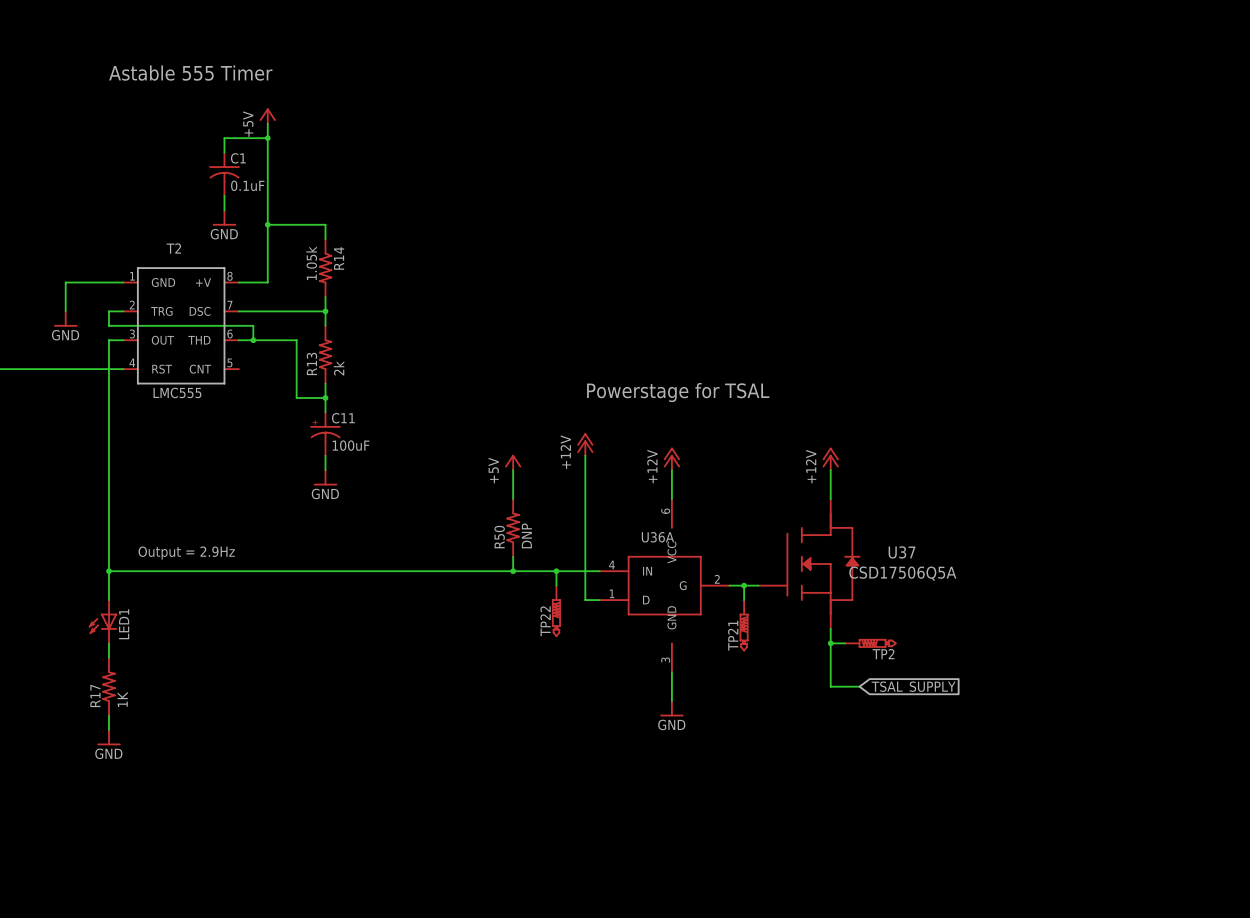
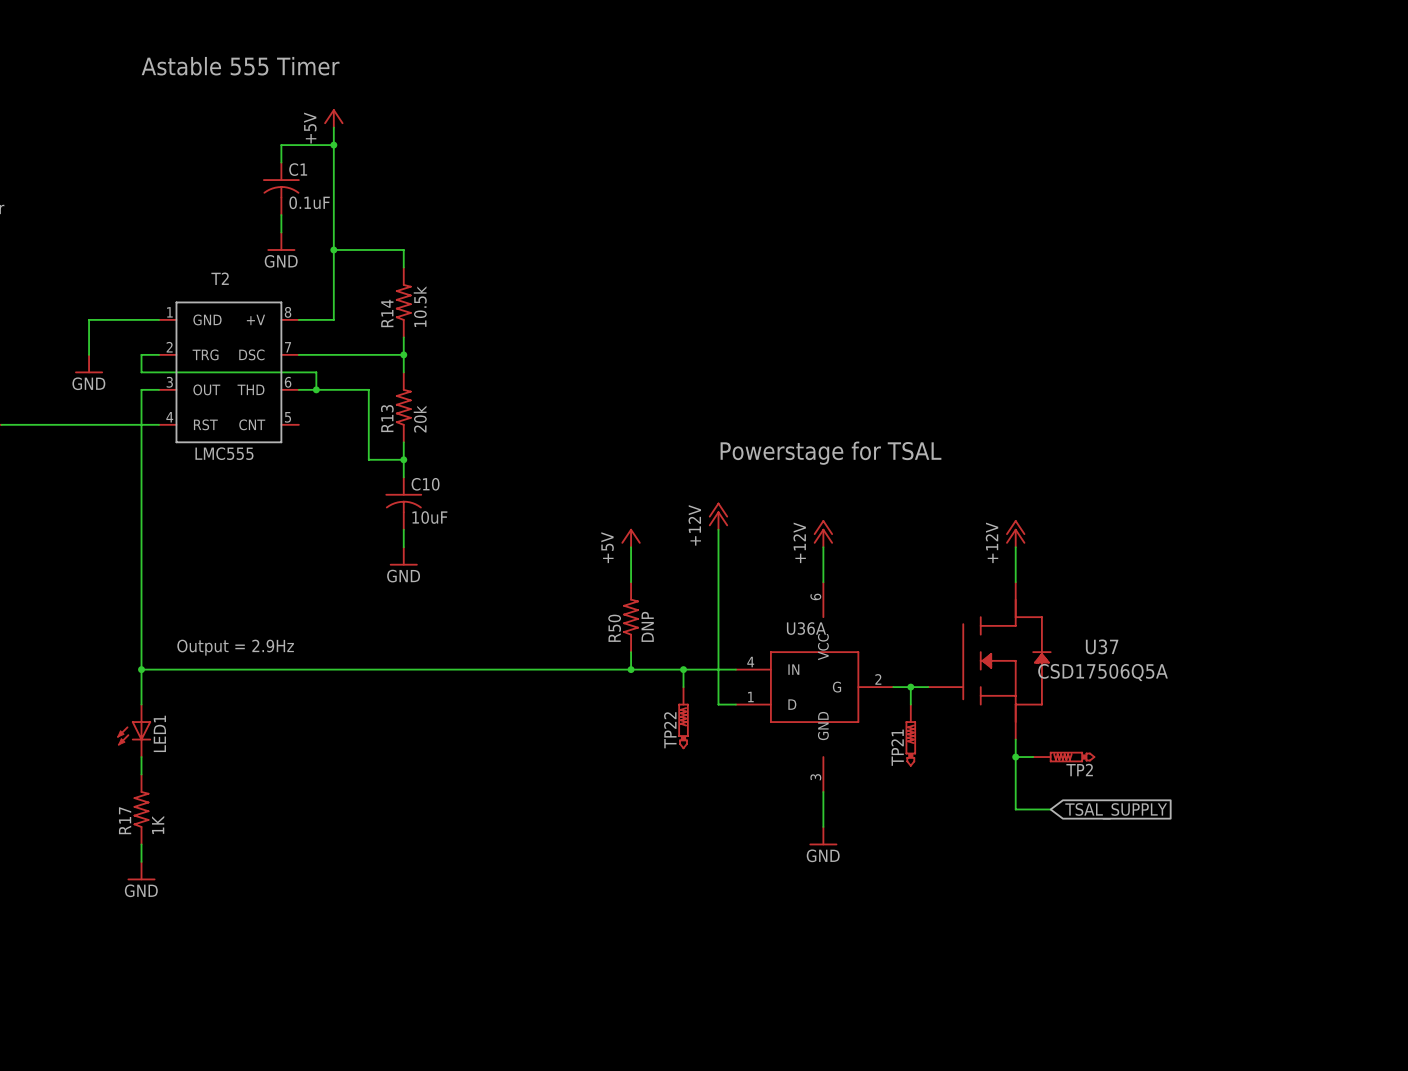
R14 value: 1.05k (311, 263) -> 10.5k (420, 306)
R14 rotation: 0° (325, 268) -> 180° (403, 302)
R13 value: 2k (339, 368) -> 20k (420, 419)
C11: 100uF (325, 434) -> none
C10: none -> 10uF (403, 503)

